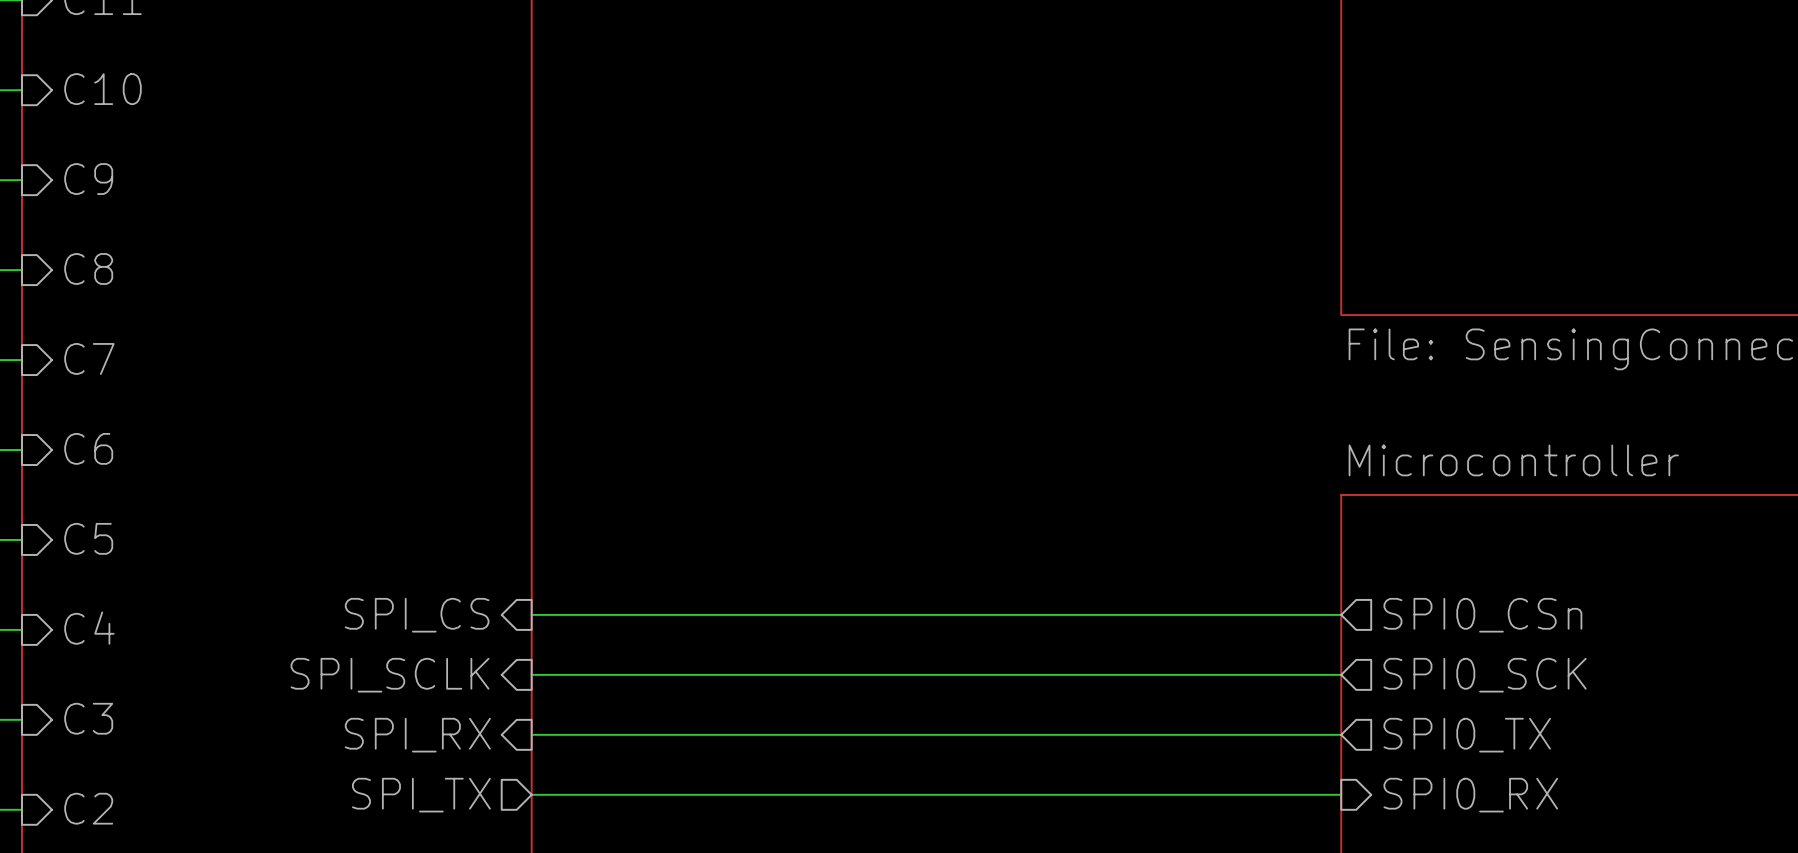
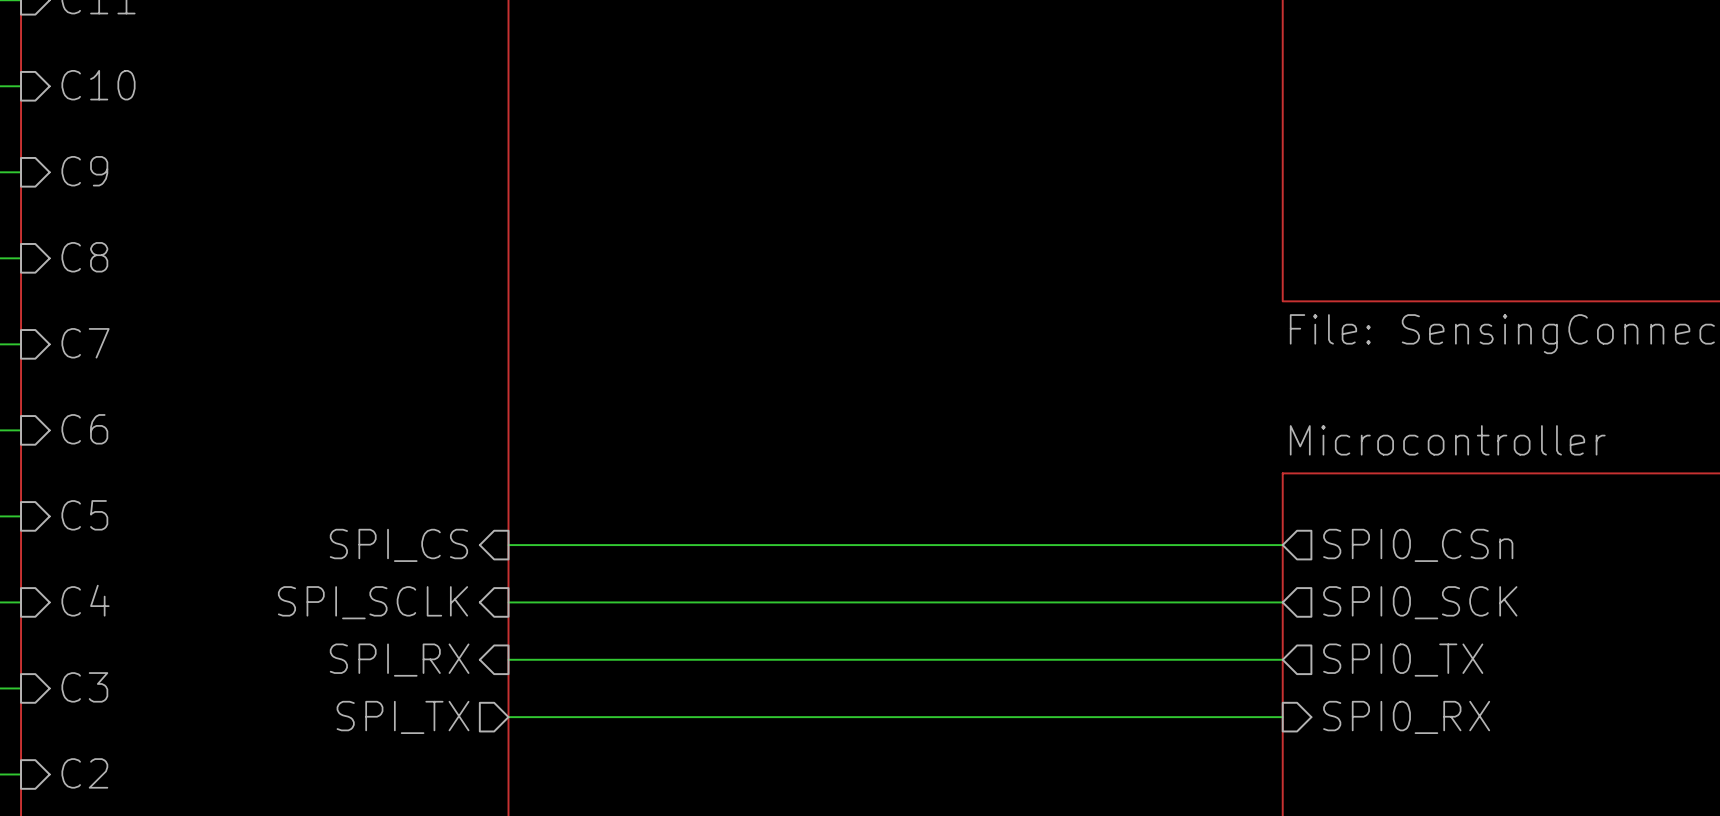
wire: (531, 614) (1341, 614) -> (508, 545) (1282, 545)
sheet pin position: SPI_CS (417, 615) -> SPI_CS (398, 545)
sheet pin position: SPI0_CSn (1482, 615) -> SPI0_CSn (1418, 545)
wire: (531, 674) (1341, 674) -> (508, 602) (1282, 602)
sheet pin position: SPI_SCLK (390, 675) -> SPI_SCLK (372, 602)
sheet pin position: SPI0_SCK (1485, 675) -> SPI0_SCK (1420, 602)
wire: (531, 734) (1341, 734) -> (508, 659) (1282, 659)
sheet pin position: SPI_RX (417, 735) -> SPI_RX (399, 660)
sheet pin position: SPI0_TX (1467, 735) -> SPI0_TX (1403, 660)
wire: (531, 794) (1341, 794) -> (508, 717) (1282, 717)
sheet pin position: SPI_TX (421, 795) -> SPI_TX (403, 717)
sheet pin position: SPI0_RX (1470, 795) -> SPI0_RX (1406, 717)

